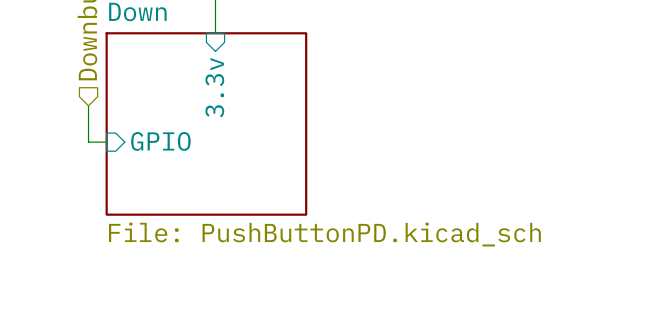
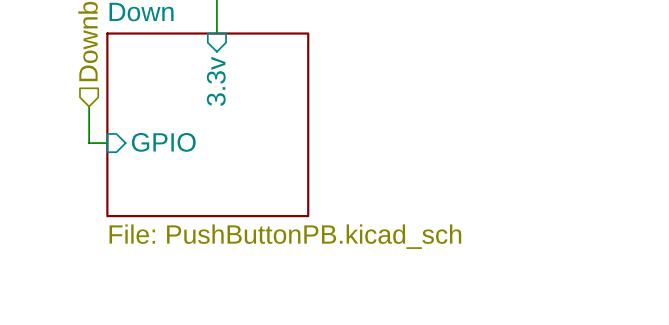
sheet Down value: File: PushButtonPD.kicad_sch (324, 234) -> File: PushButtonPB.kicad_sch (285, 236)

